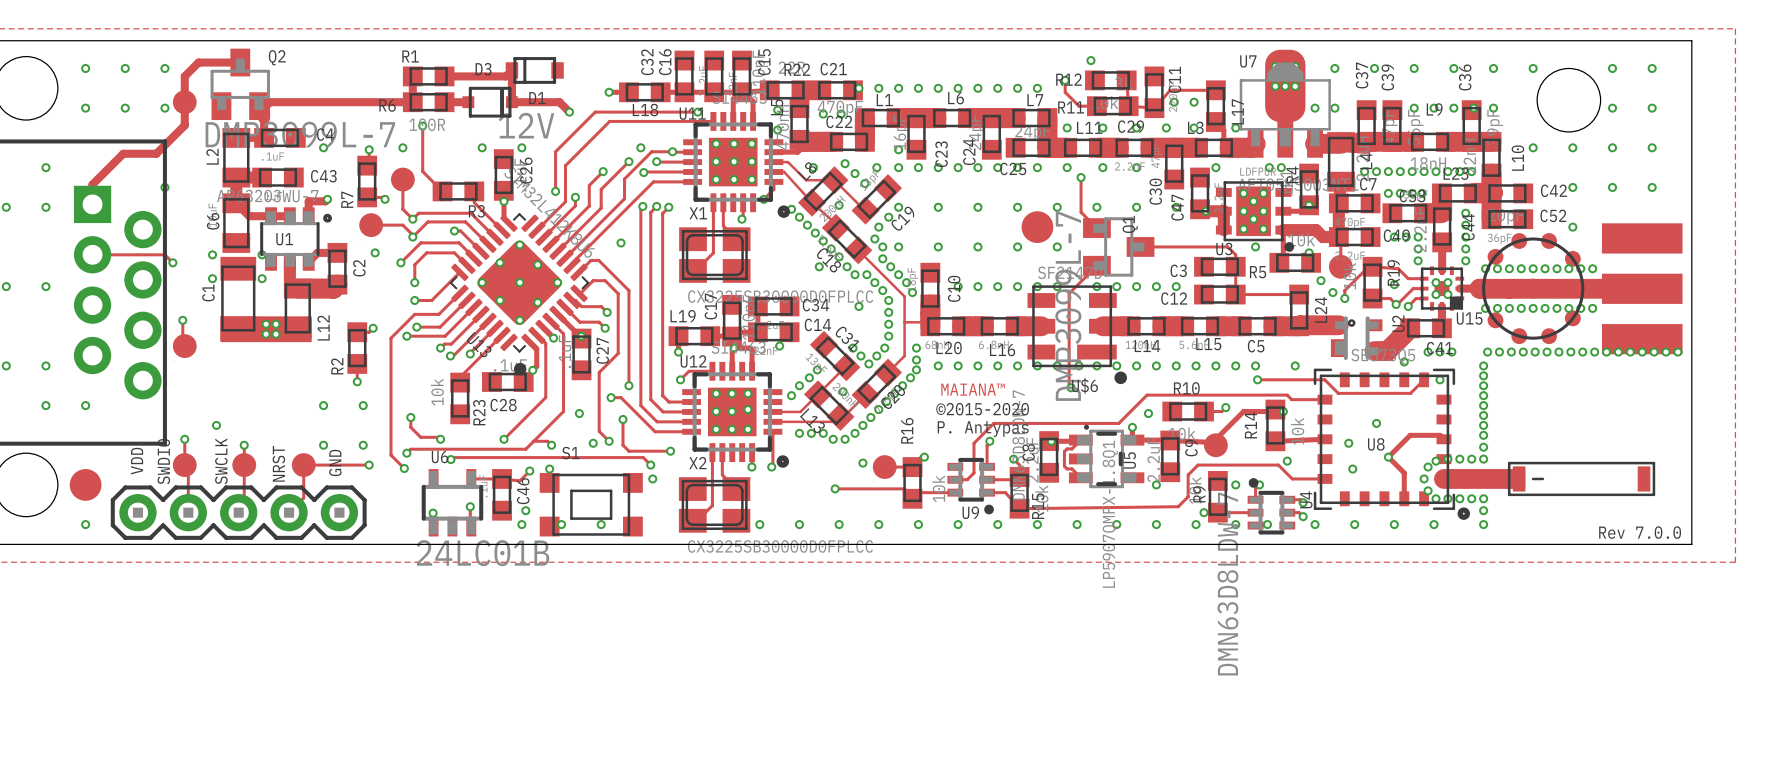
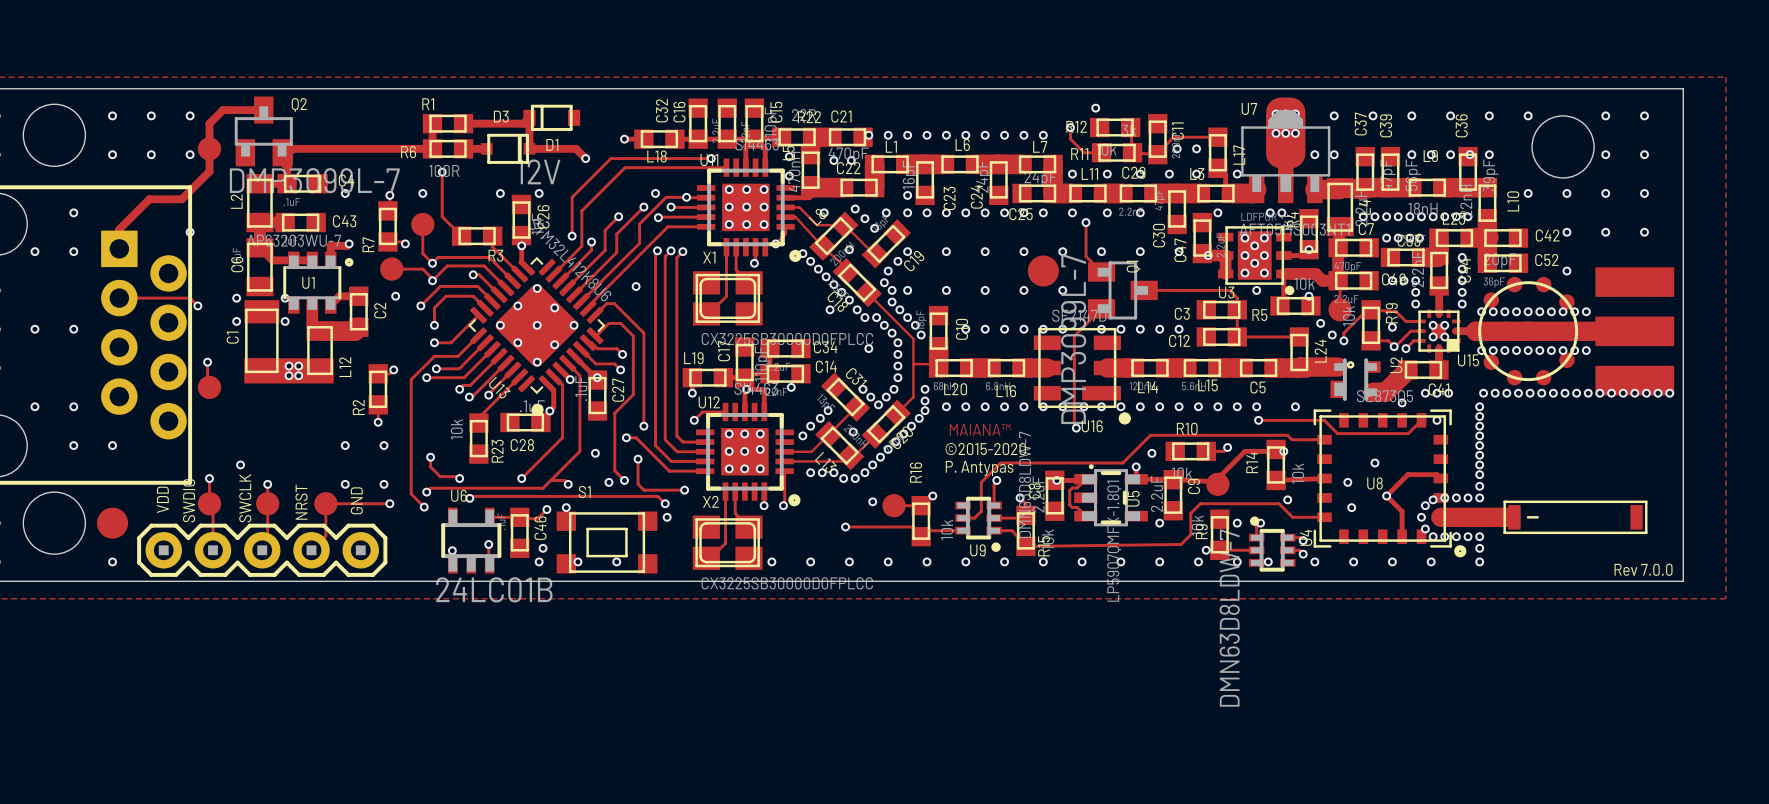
U$6 name: U$6 (1085, 385) -> U16 (1092, 426)

